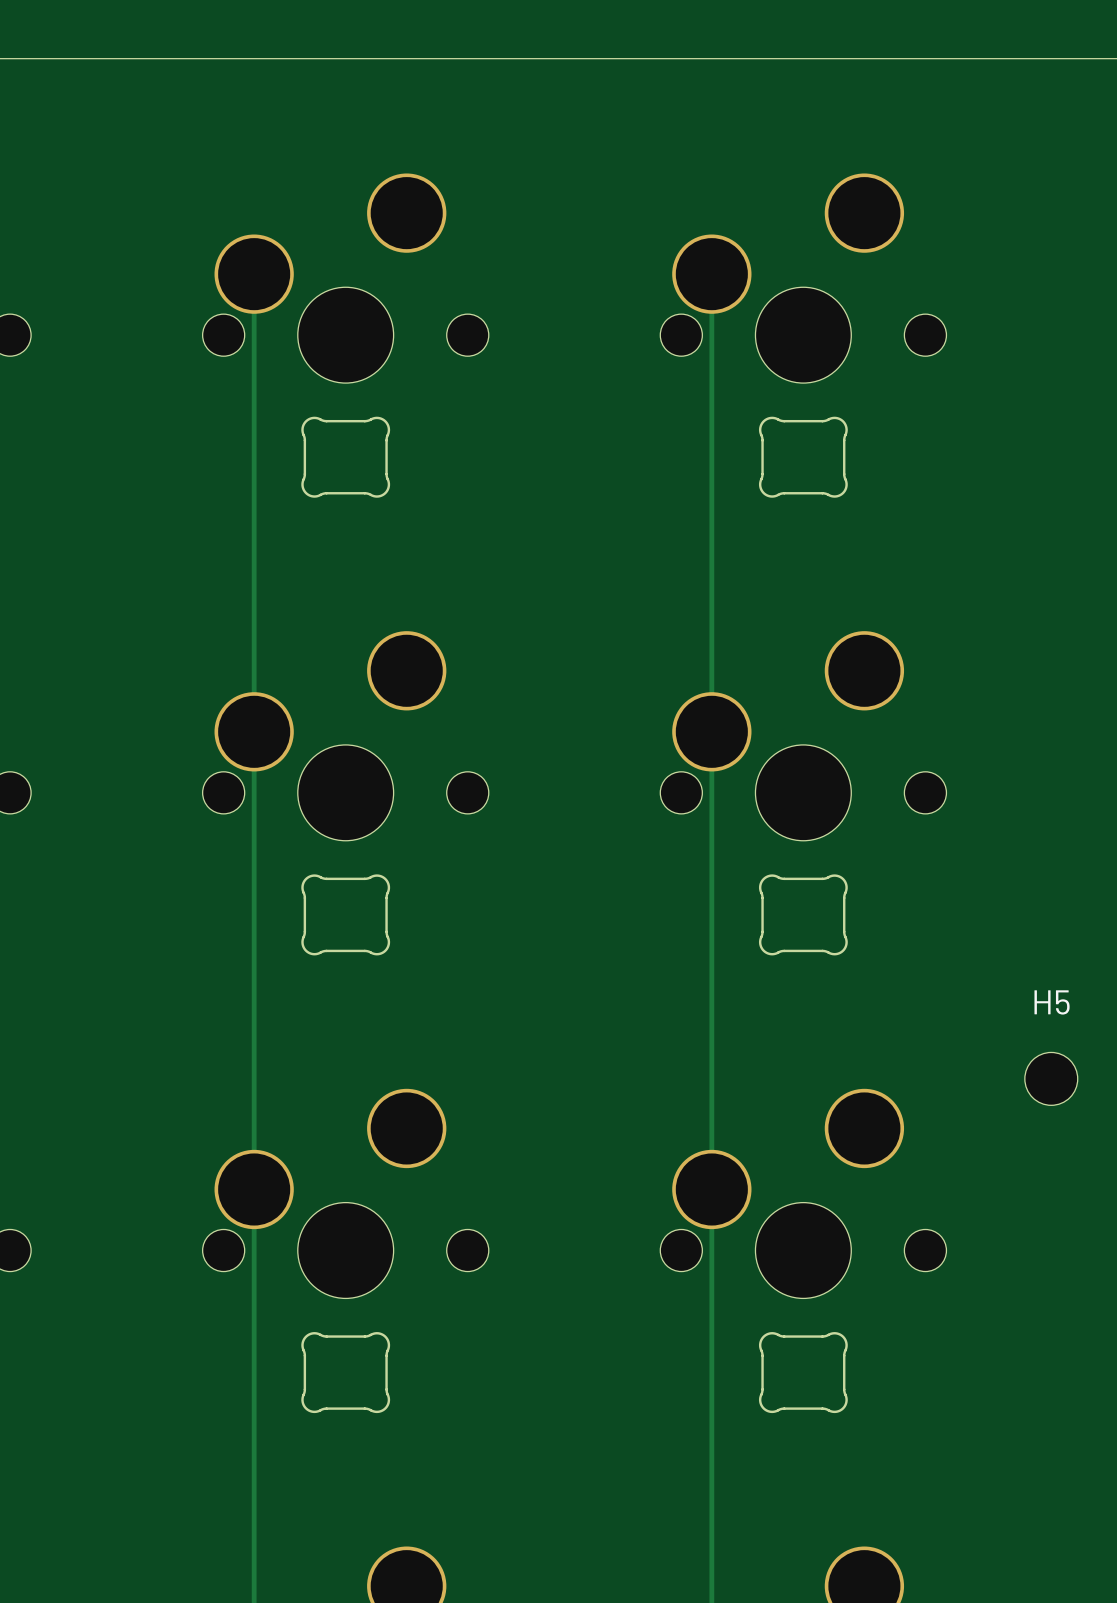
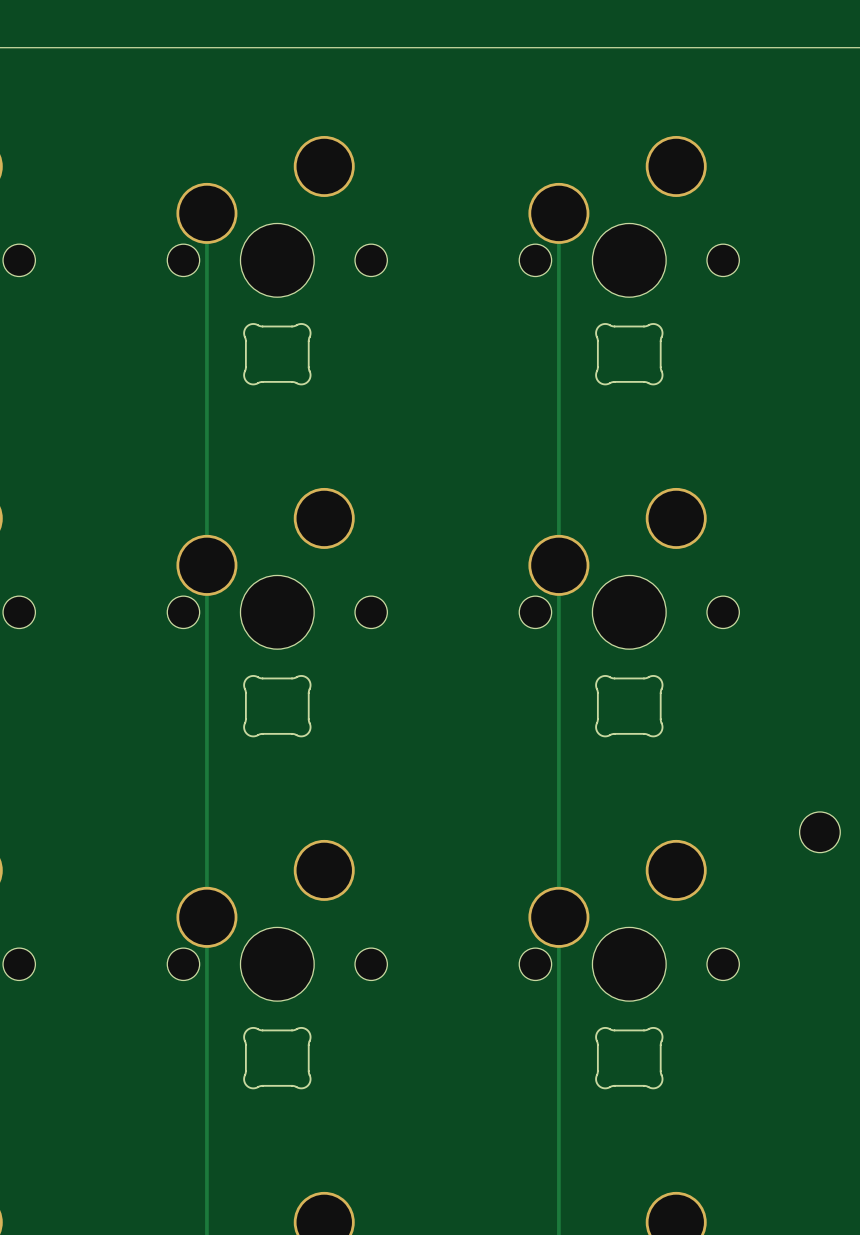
H5 name: H5 (1052, 1002) -> none

